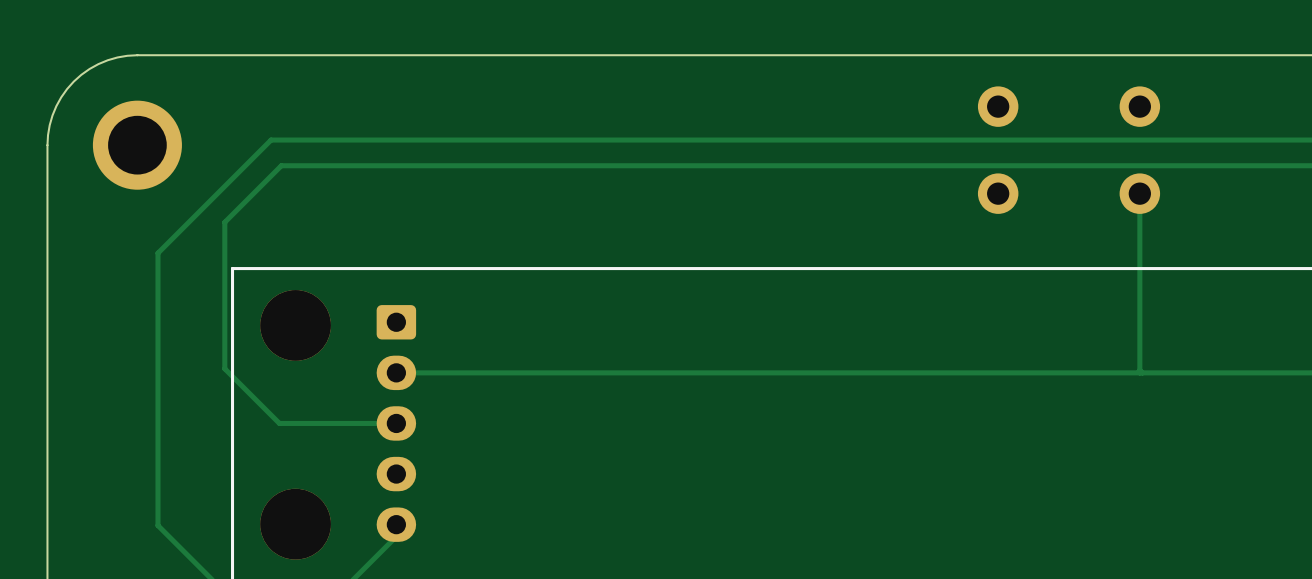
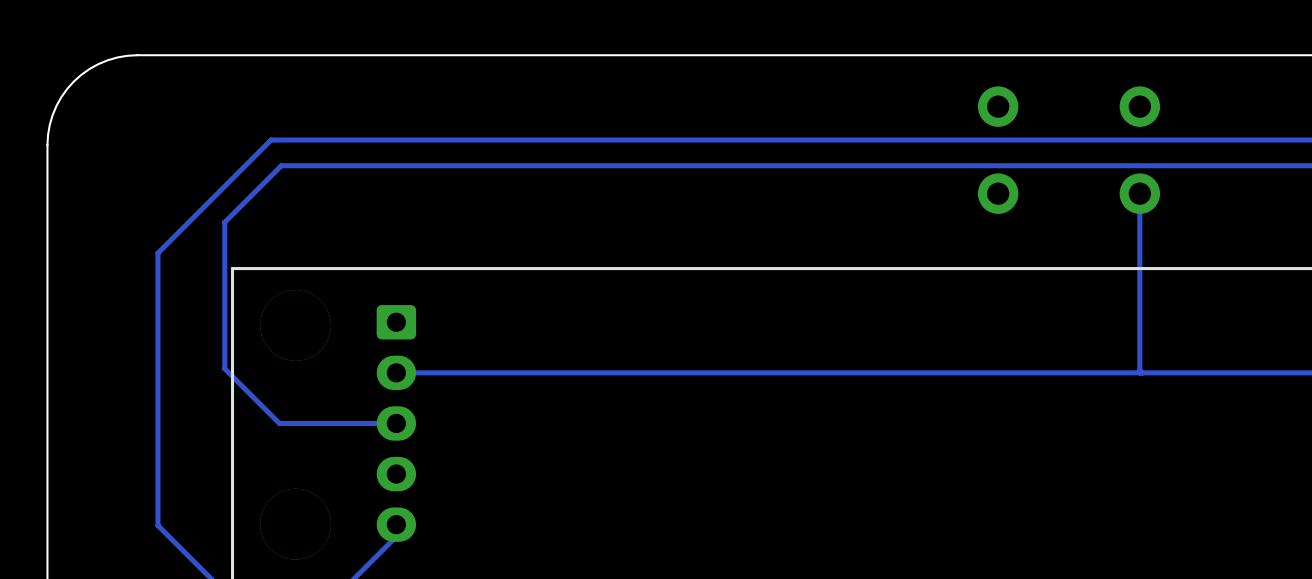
part: (137, 145) -> none

